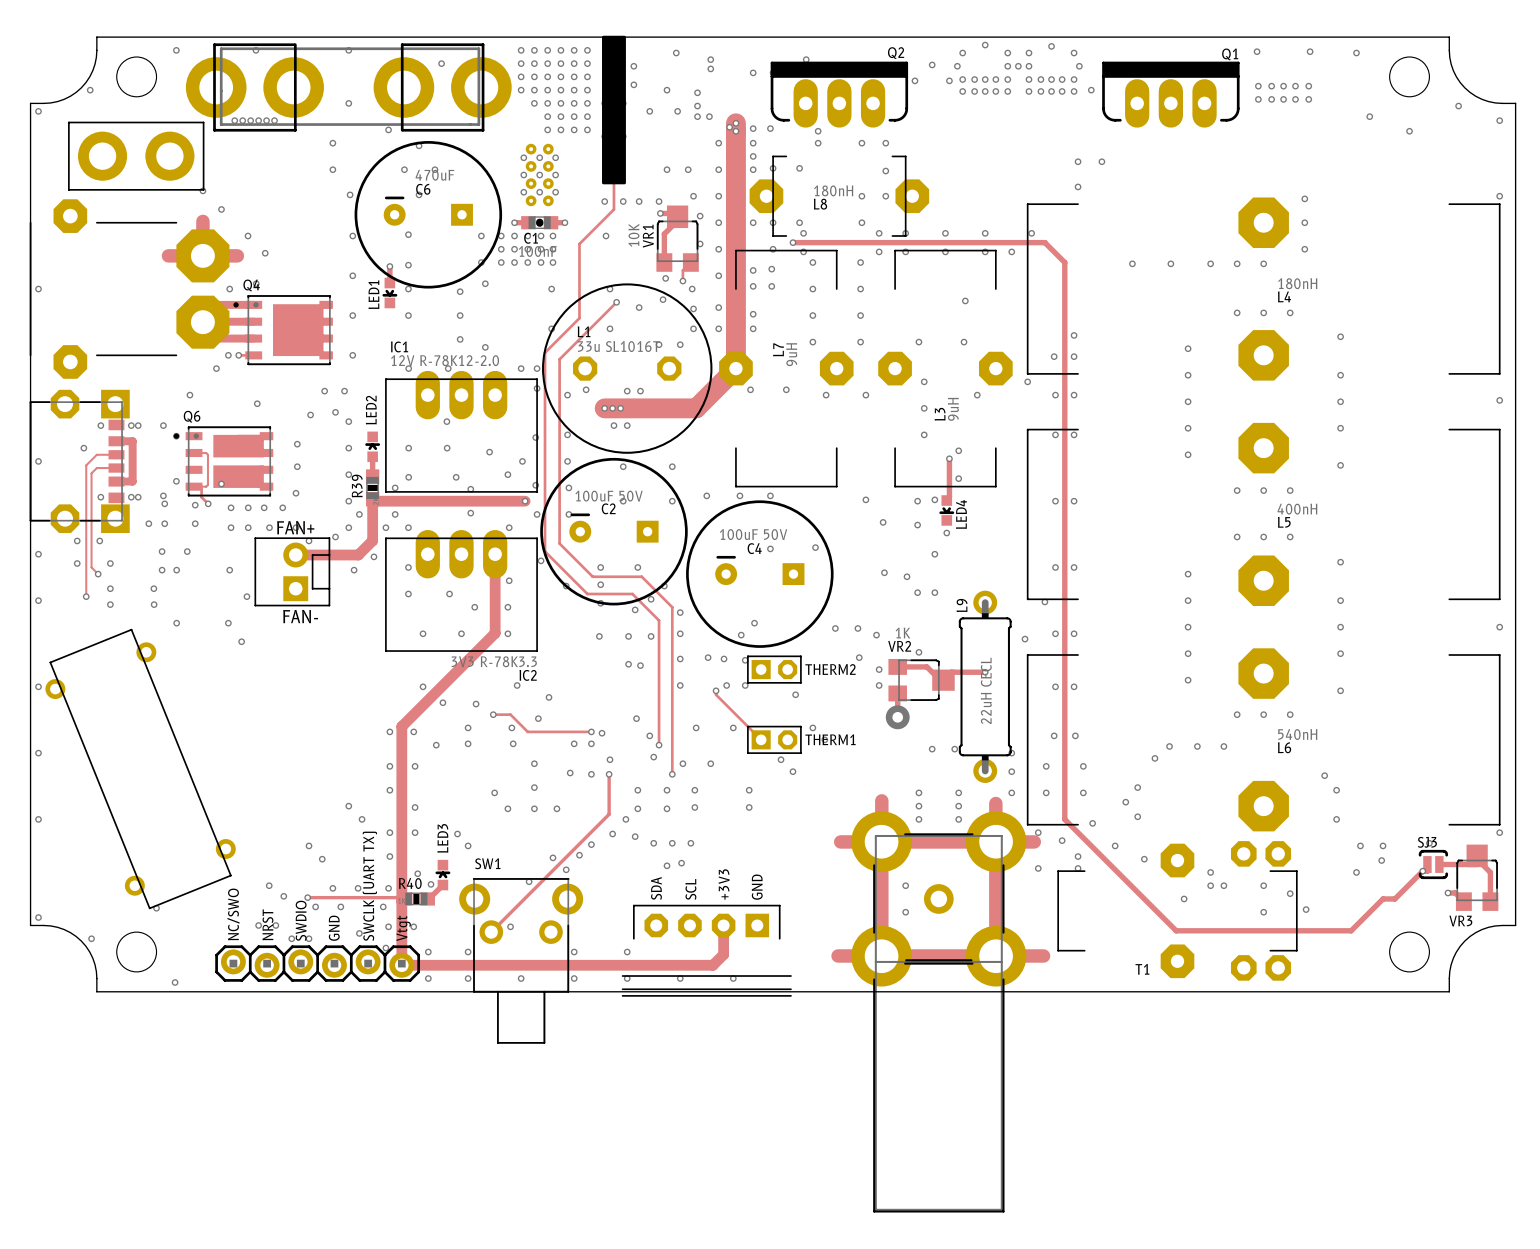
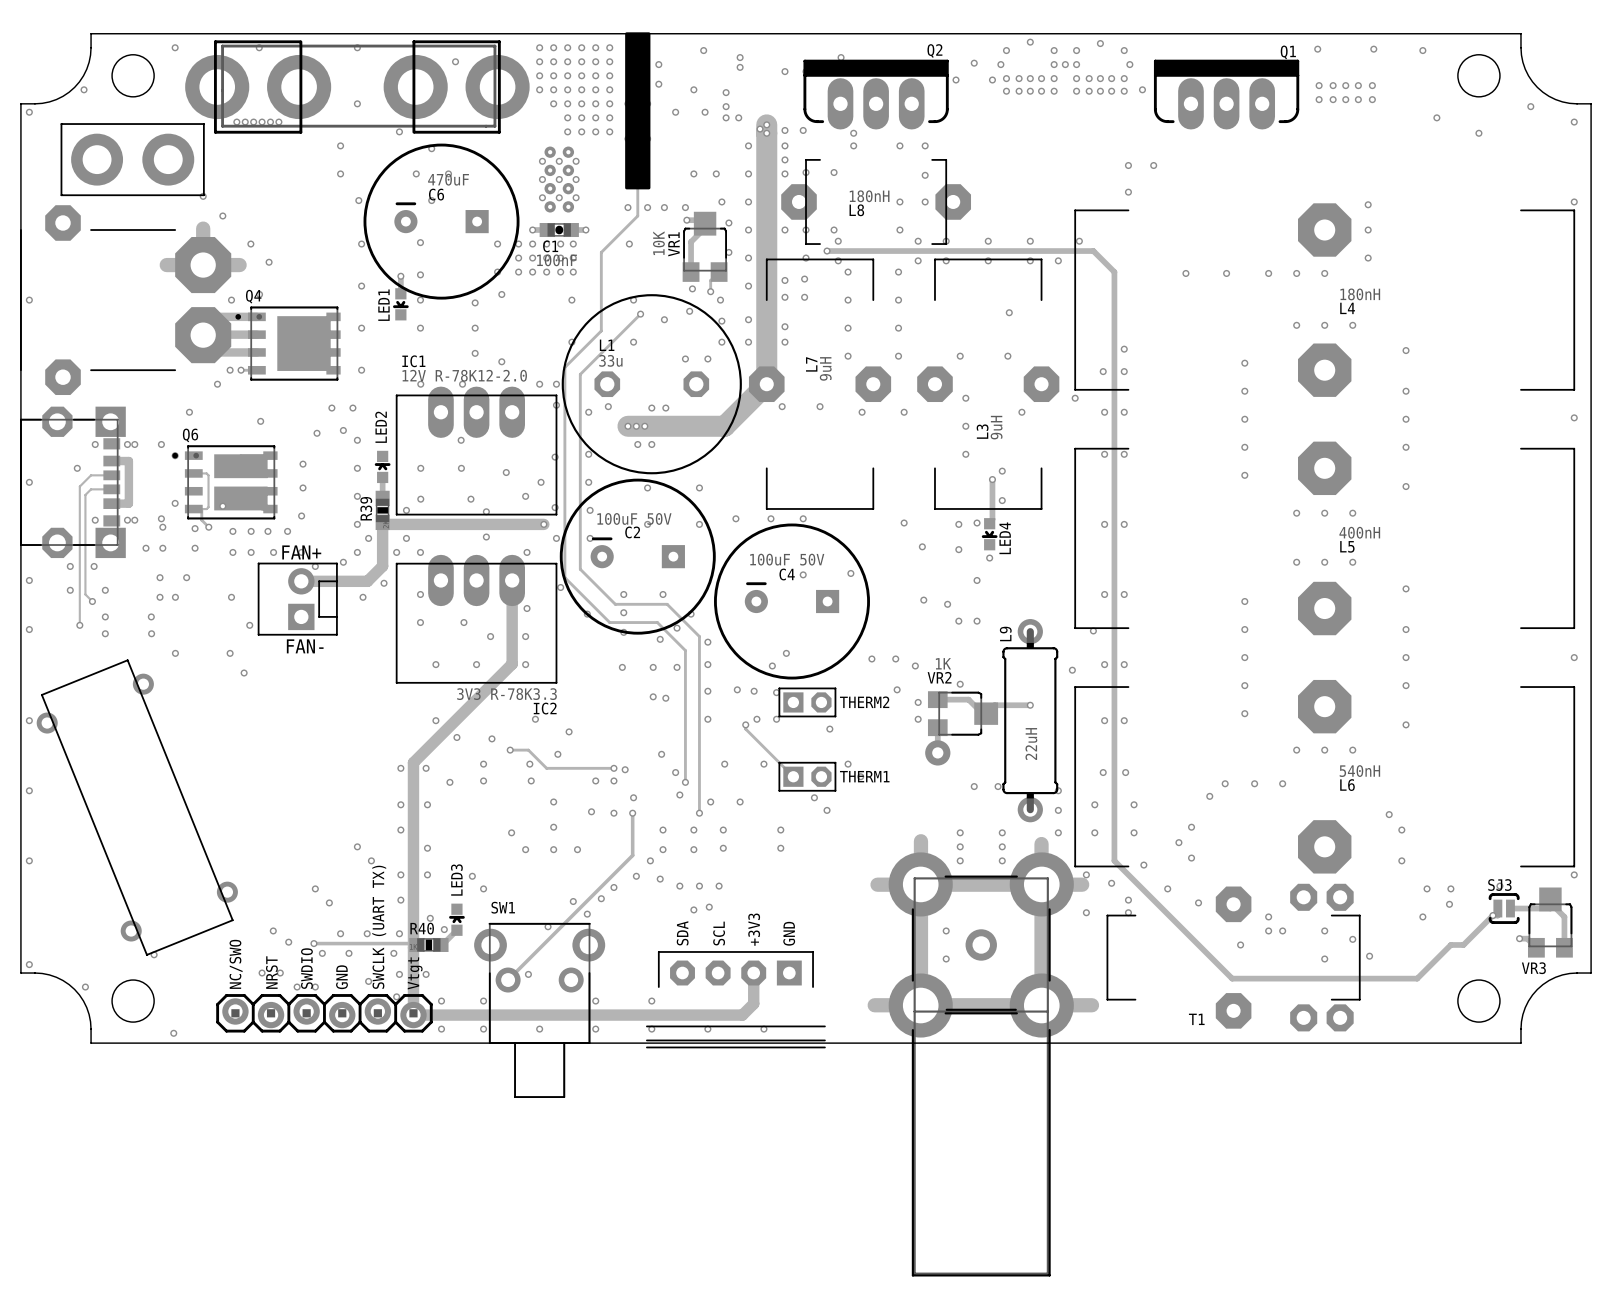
L1 value: 33u SL1016T (618, 346) -> 33u (610, 360)
L9 value: 22uH CECL (986, 690) -> 22uH (1031, 743)

